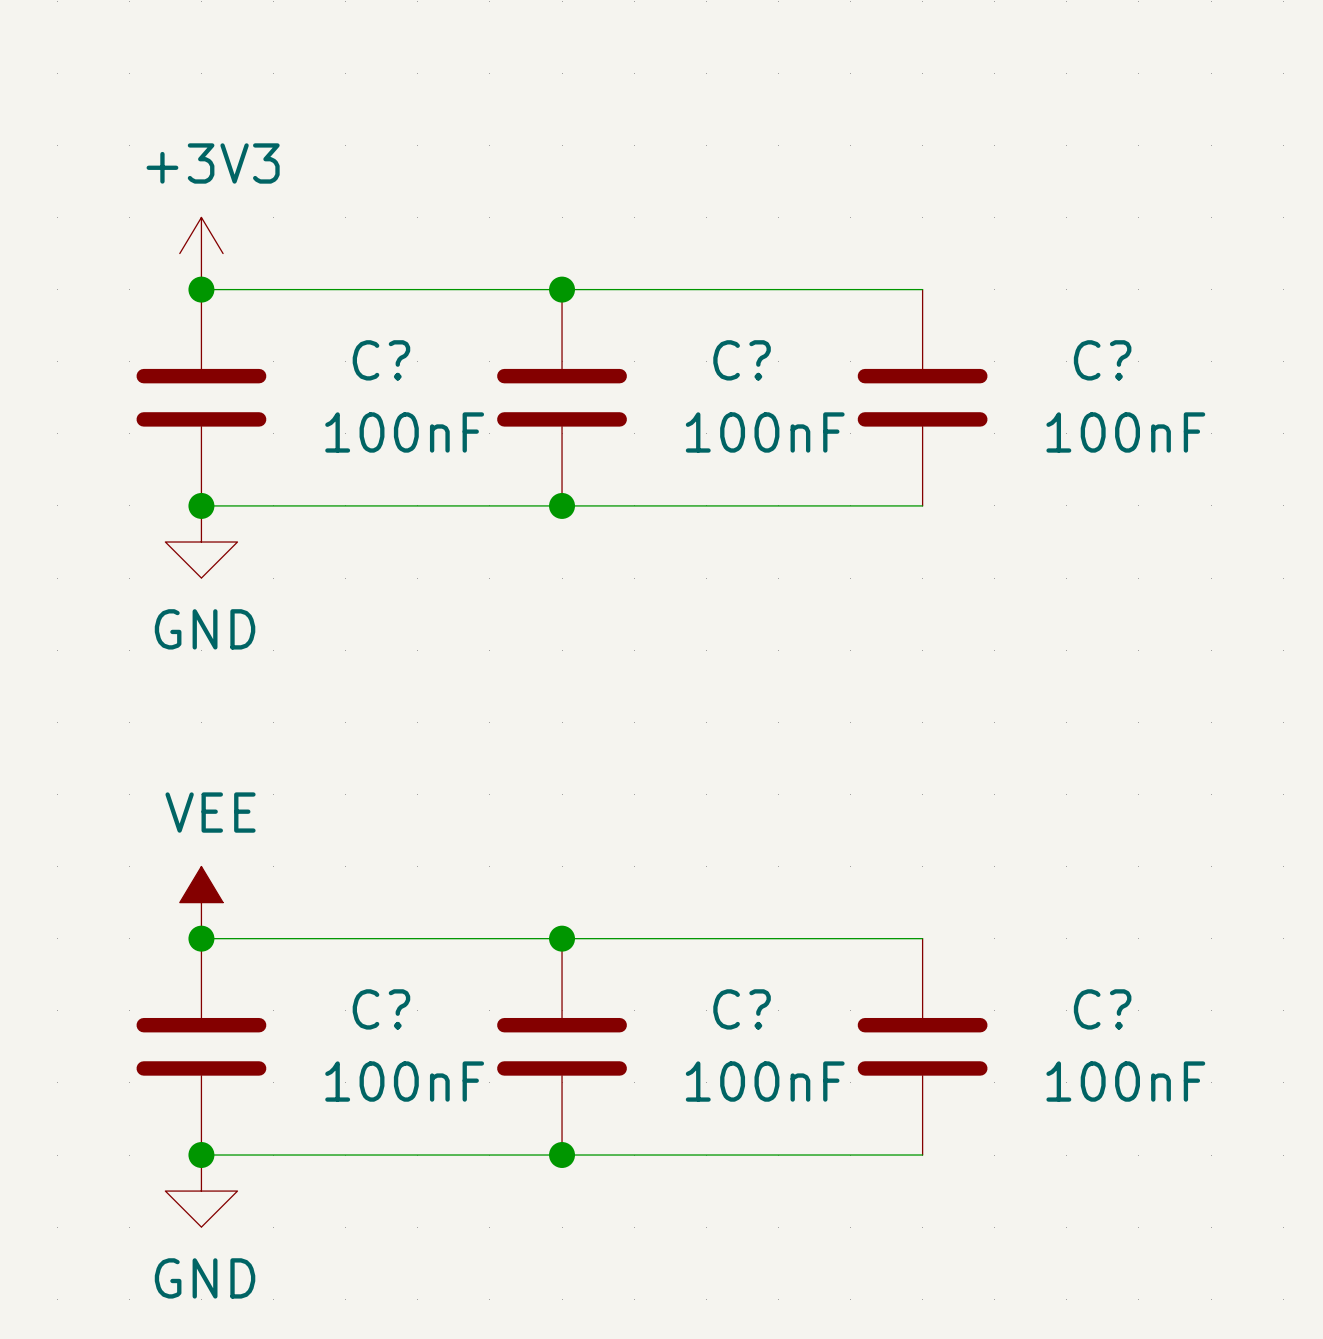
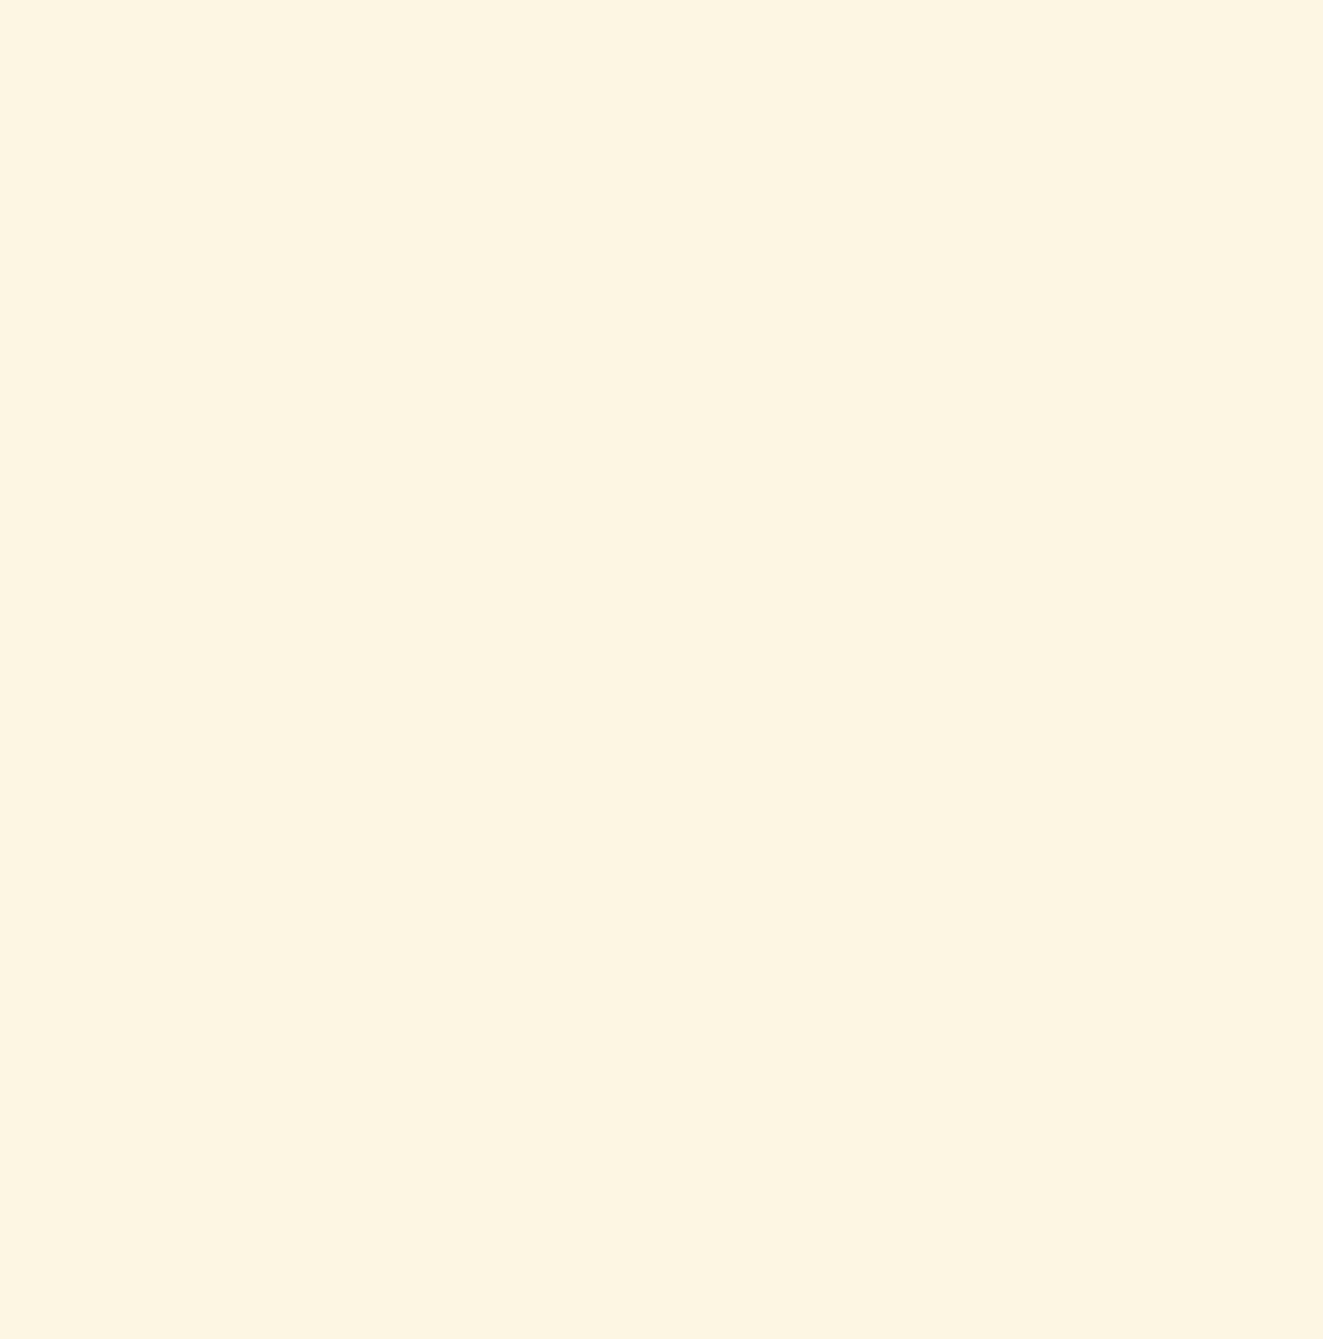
power symbol: +3V3 (201, 253) -> none
wire: (201, 289) (922, 289) -> none
junction: (201, 289) -> none
junction: (562, 289) -> none
C?: 100nF (201, 397) -> none
C?: 100nF (562, 397) -> none
C?: 100nF (922, 397) -> none
wire: (201, 505) (922, 505) -> none
junction: (201, 505) -> none
junction: (562, 505) -> none
power symbol: GND (201, 542) -> none
power symbol: VEE (201, 902) -> none
wire: (201, 938) (922, 938) -> none
junction: (201, 938) -> none
junction: (562, 938) -> none
C?: 100nF (201, 1046) -> none
C?: 100nF (562, 1046) -> none
C?: 100nF (922, 1046) -> none
wire: (201, 1155) (922, 1155) -> none
junction: (201, 1155) -> none
junction: (562, 1155) -> none
power symbol: GND (201, 1191) -> none

